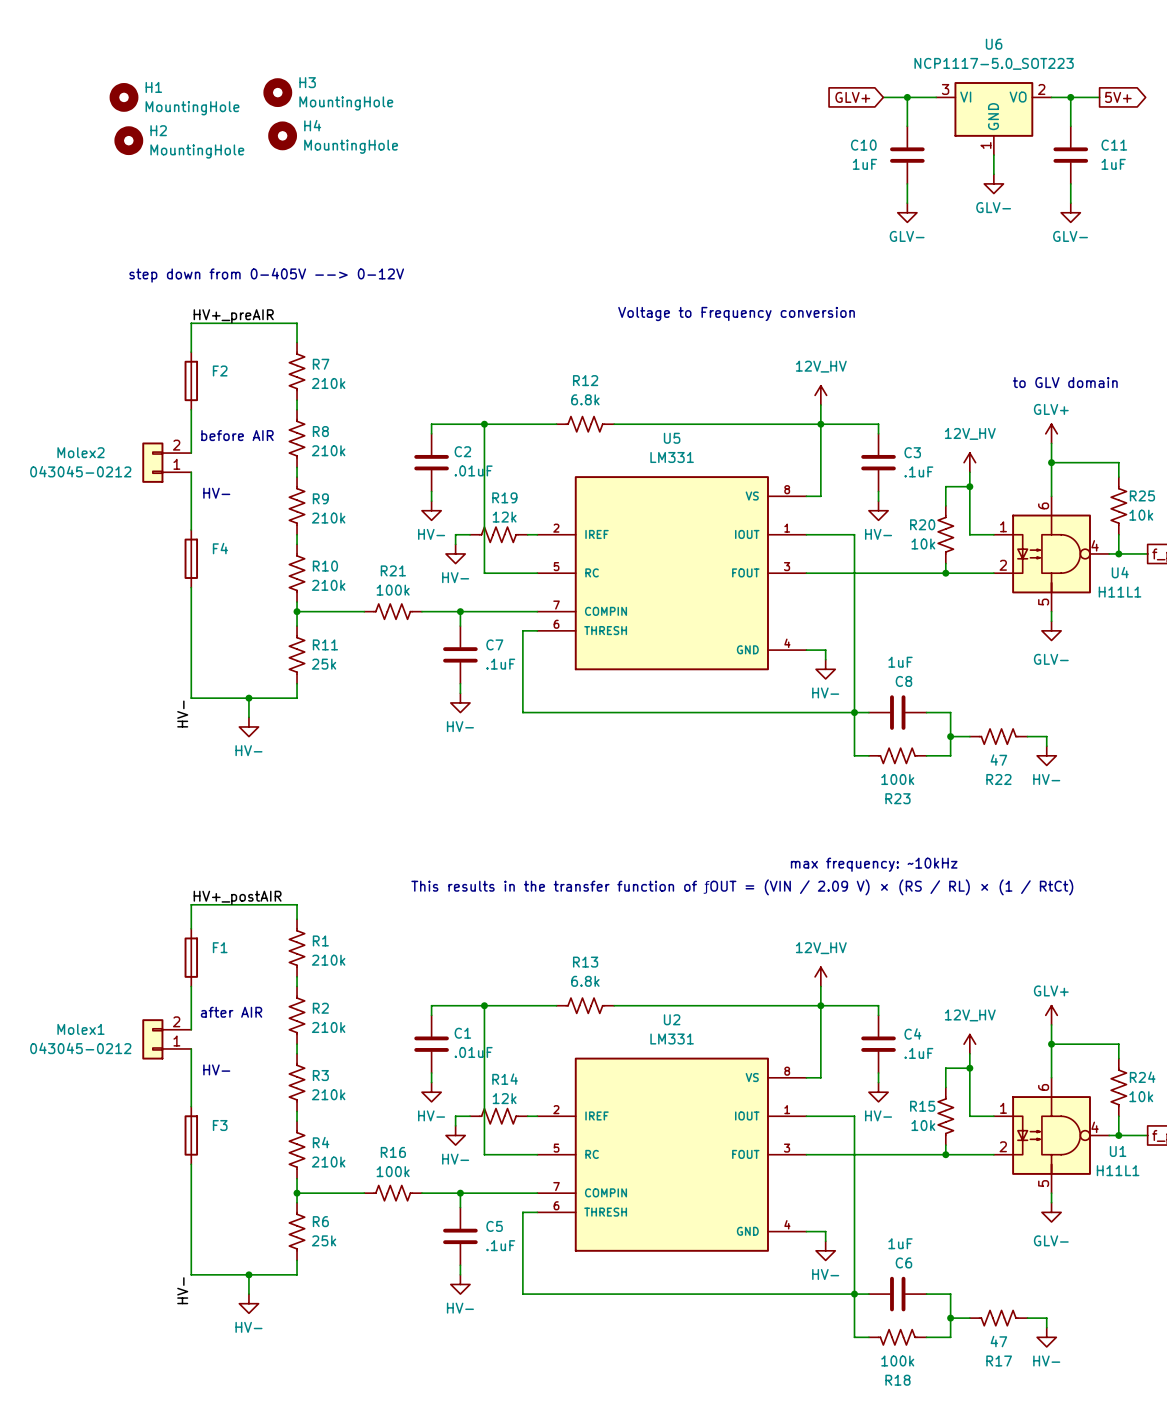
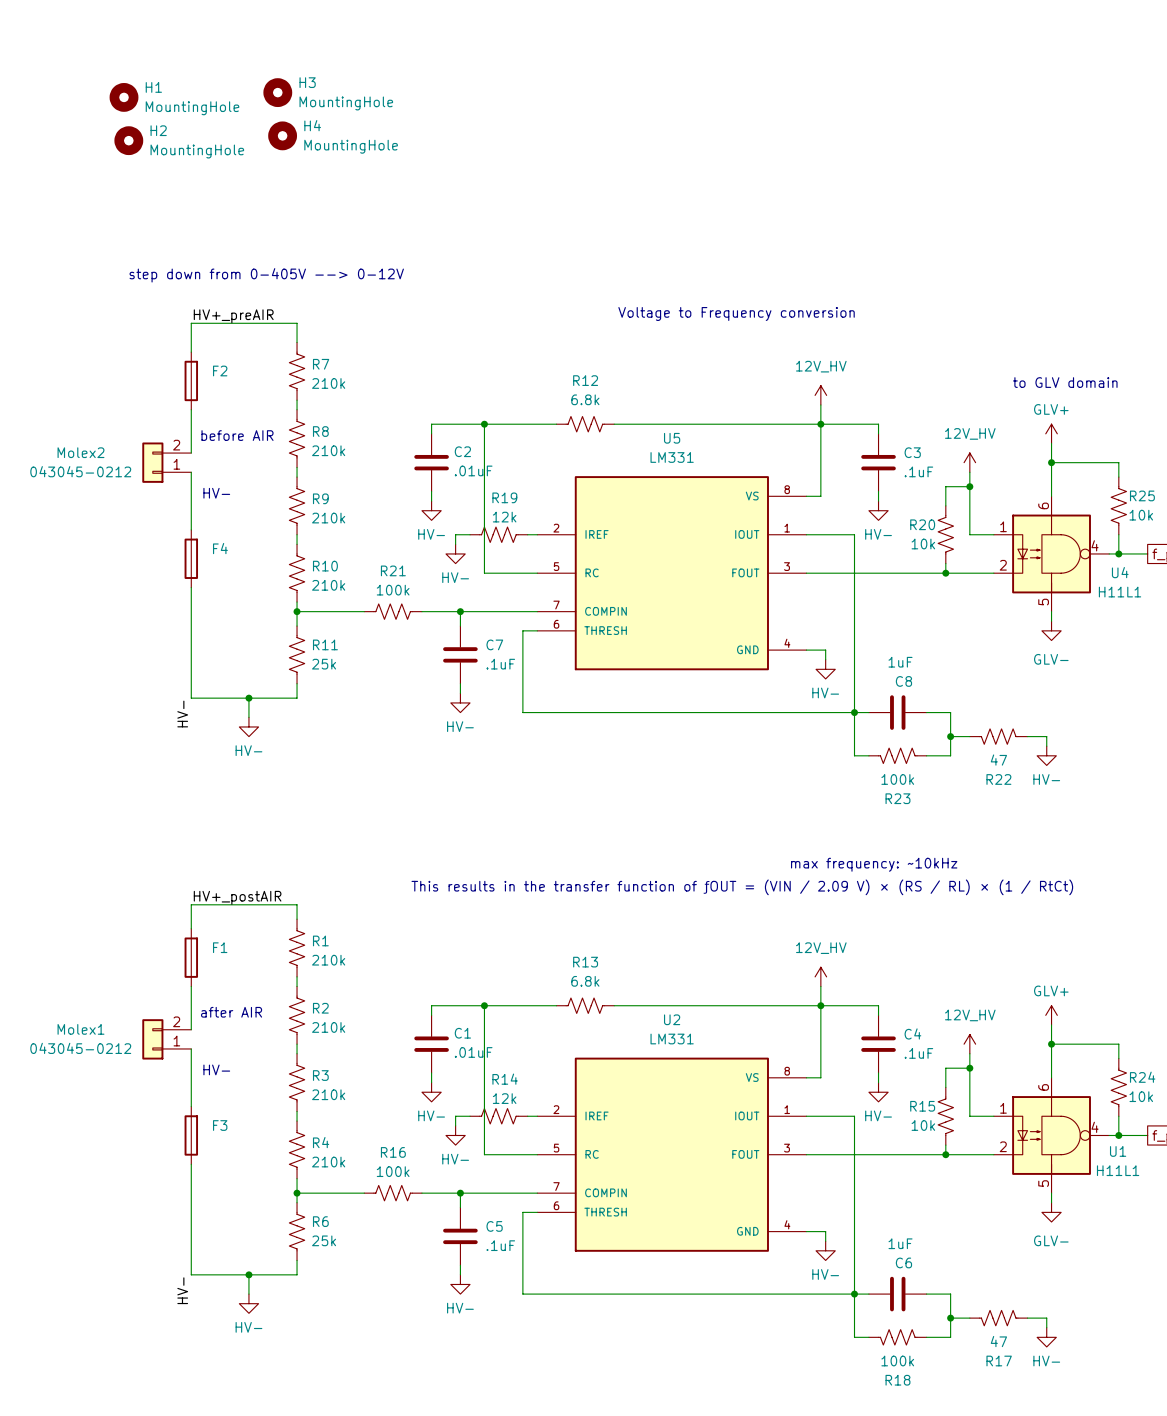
global label: GLV+ (852, 97) -> none
wire: (883, 97) (936, 97) -> none
wire: (907, 97) (907, 126) -> none
junction: (907, 97) -> none
wire: (1051, 97) (1099, 97) -> none
wire: (1070, 97) (1070, 126) -> none
junction: (1070, 97) -> none
global label: 5V+ (1118, 97) -> none
U6: NCP1117-5.0_SOT223 (993, 118) -> none
C10: 1uF (907, 155) -> none
wire: (993, 155) (993, 174) -> none
C11: 1uF (1070, 155) -> none
wire: (907, 183) (907, 203) -> none
power symbol: GLV- (993, 183) -> none
wire: (1070, 183) (1070, 203) -> none
power symbol: GLV- (907, 212) -> none
power symbol: GLV- (1070, 212) -> none

